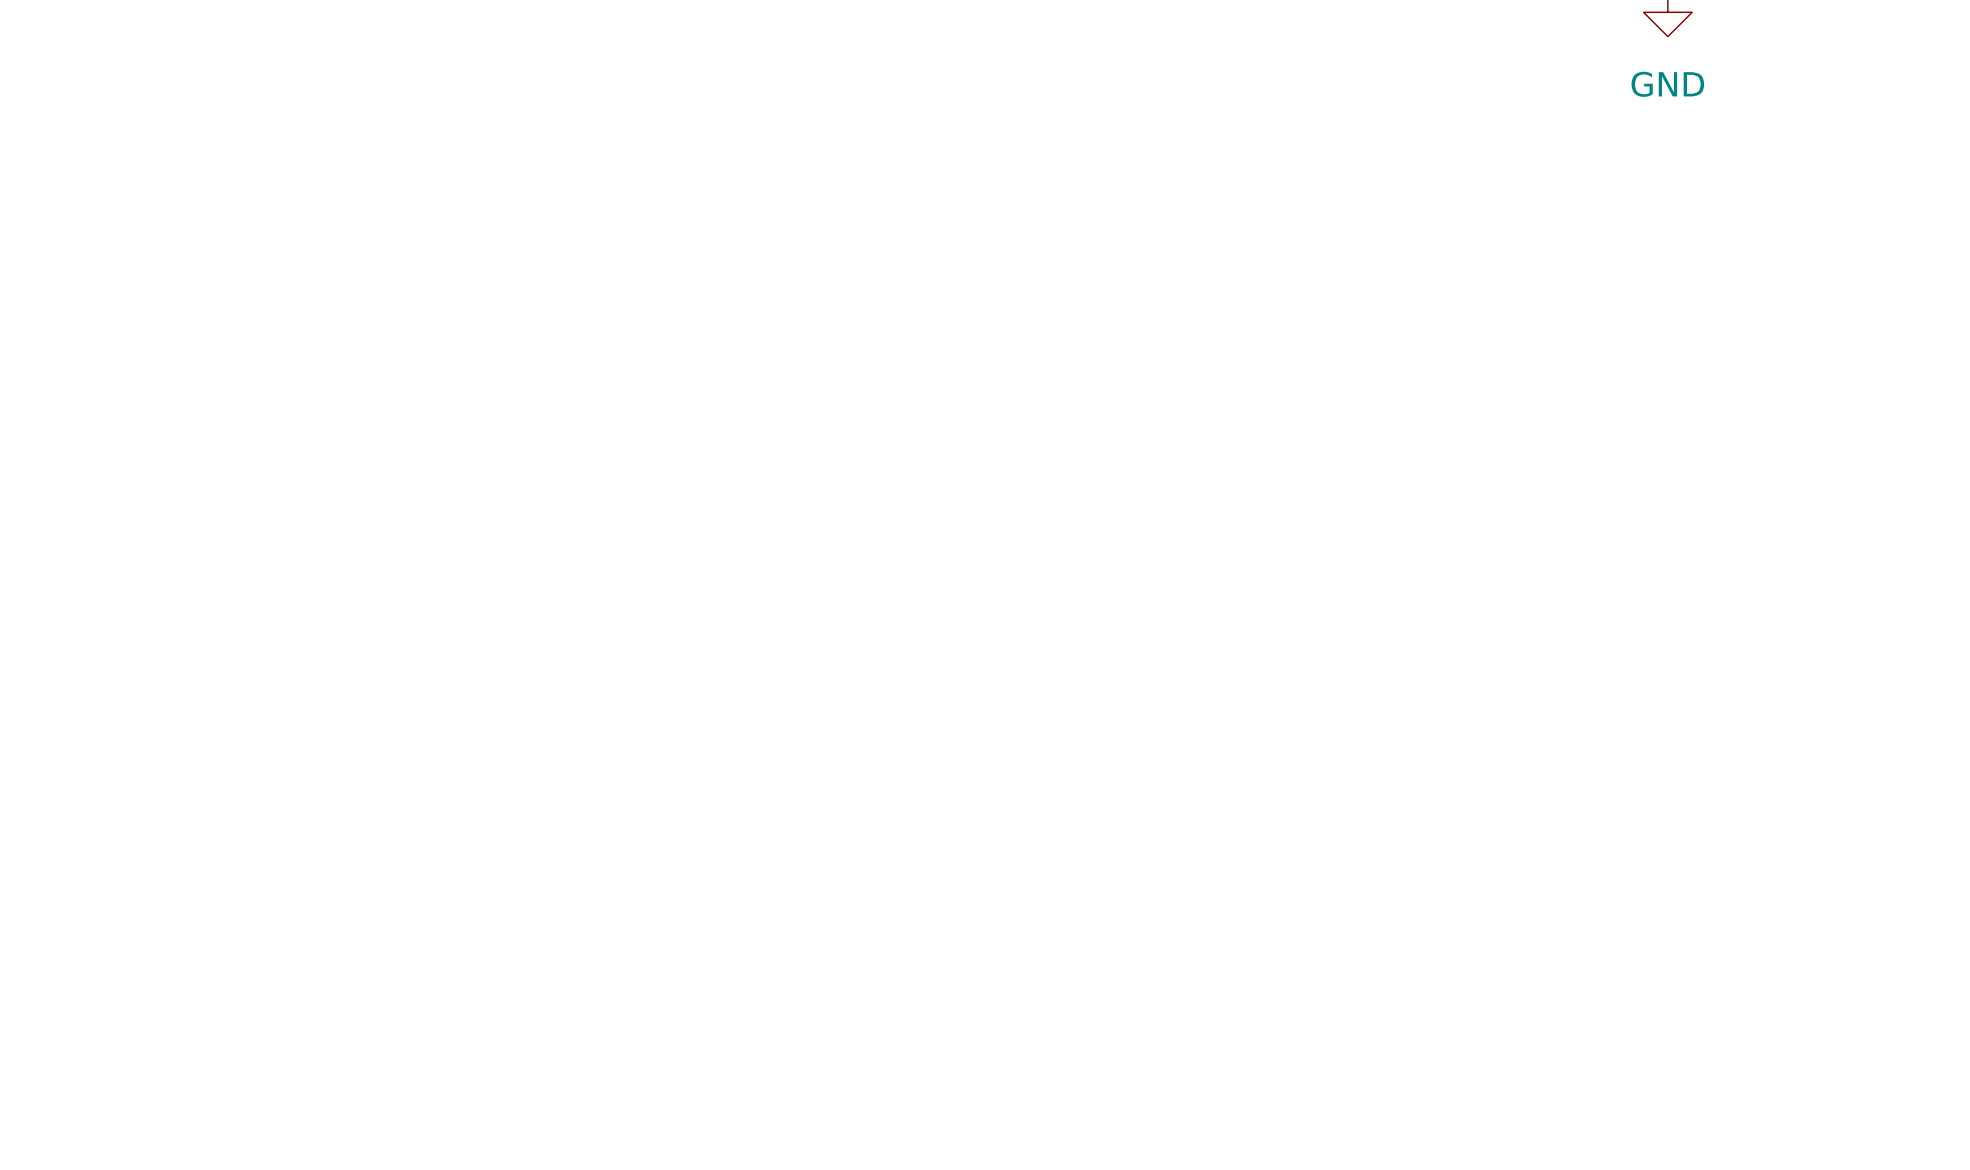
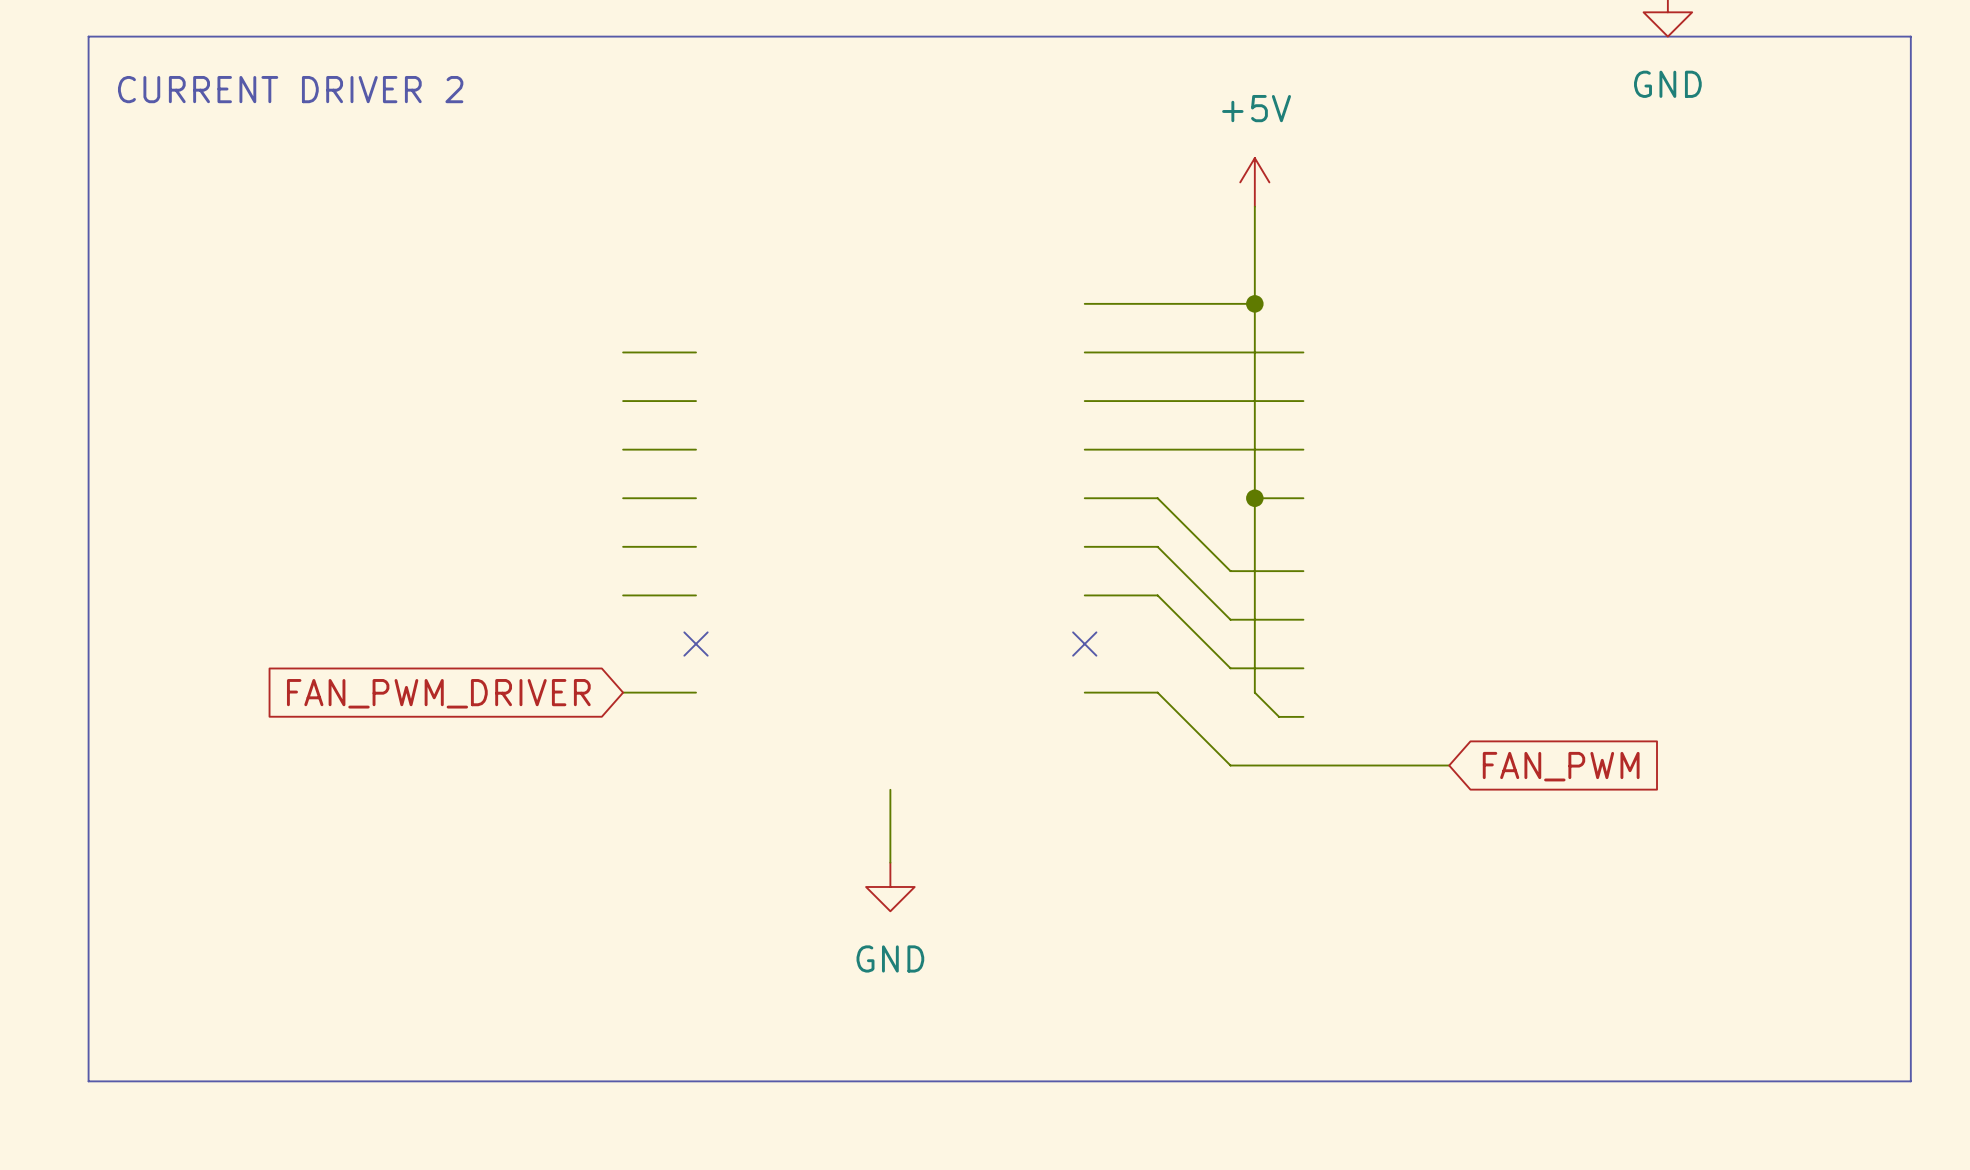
line: none -> (88, 36) (1910, 36) (1910, 1081) (88, 1081) (88, 36)
text: none -> CURRENT DRIVER 2 (290, 89)
power symbol: none -> +5V (1254, 182)
wire: none -> (1254, 206) (1254, 692) (1279, 716) (1303, 716)
wire: none -> (1084, 303) (1254, 303)
junction: none -> (1254, 303)
wire: none -> (623, 352) (696, 352)
wire: none -> (1084, 352) (1303, 352)
wire: none -> (623, 401) (696, 401)
wire: none -> (1084, 401) (1303, 401)
wire: none -> (623, 449) (696, 449)
wire: none -> (1084, 449) (1303, 449)
wire: none -> (623, 498) (696, 498)
wire: none -> (1084, 498) (1157, 498) (1230, 571) (1303, 571)
wire: none -> (1254, 498) (1303, 498)
junction: none -> (1254, 498)
wire: none -> (623, 546) (696, 546)
wire: none -> (1084, 546) (1157, 546) (1230, 619) (1303, 619)
wire: none -> (623, 595) (696, 595)
wire: none -> (1084, 595) (1157, 595) (1230, 668) (1303, 668)
no-connect mark: none -> (696, 644)
no-connect mark: none -> (1084, 644)
wire: none -> (623, 692) (696, 692)
wire: none -> (1084, 692) (1157, 692) (1230, 765) (1449, 765)
global label: none -> FAN_PWM_DRIVER (438, 693)
global label: none -> FAN_PWM (1561, 766)
wire: none -> (890, 789) (890, 862)
power symbol: none -> GND (890, 886)

